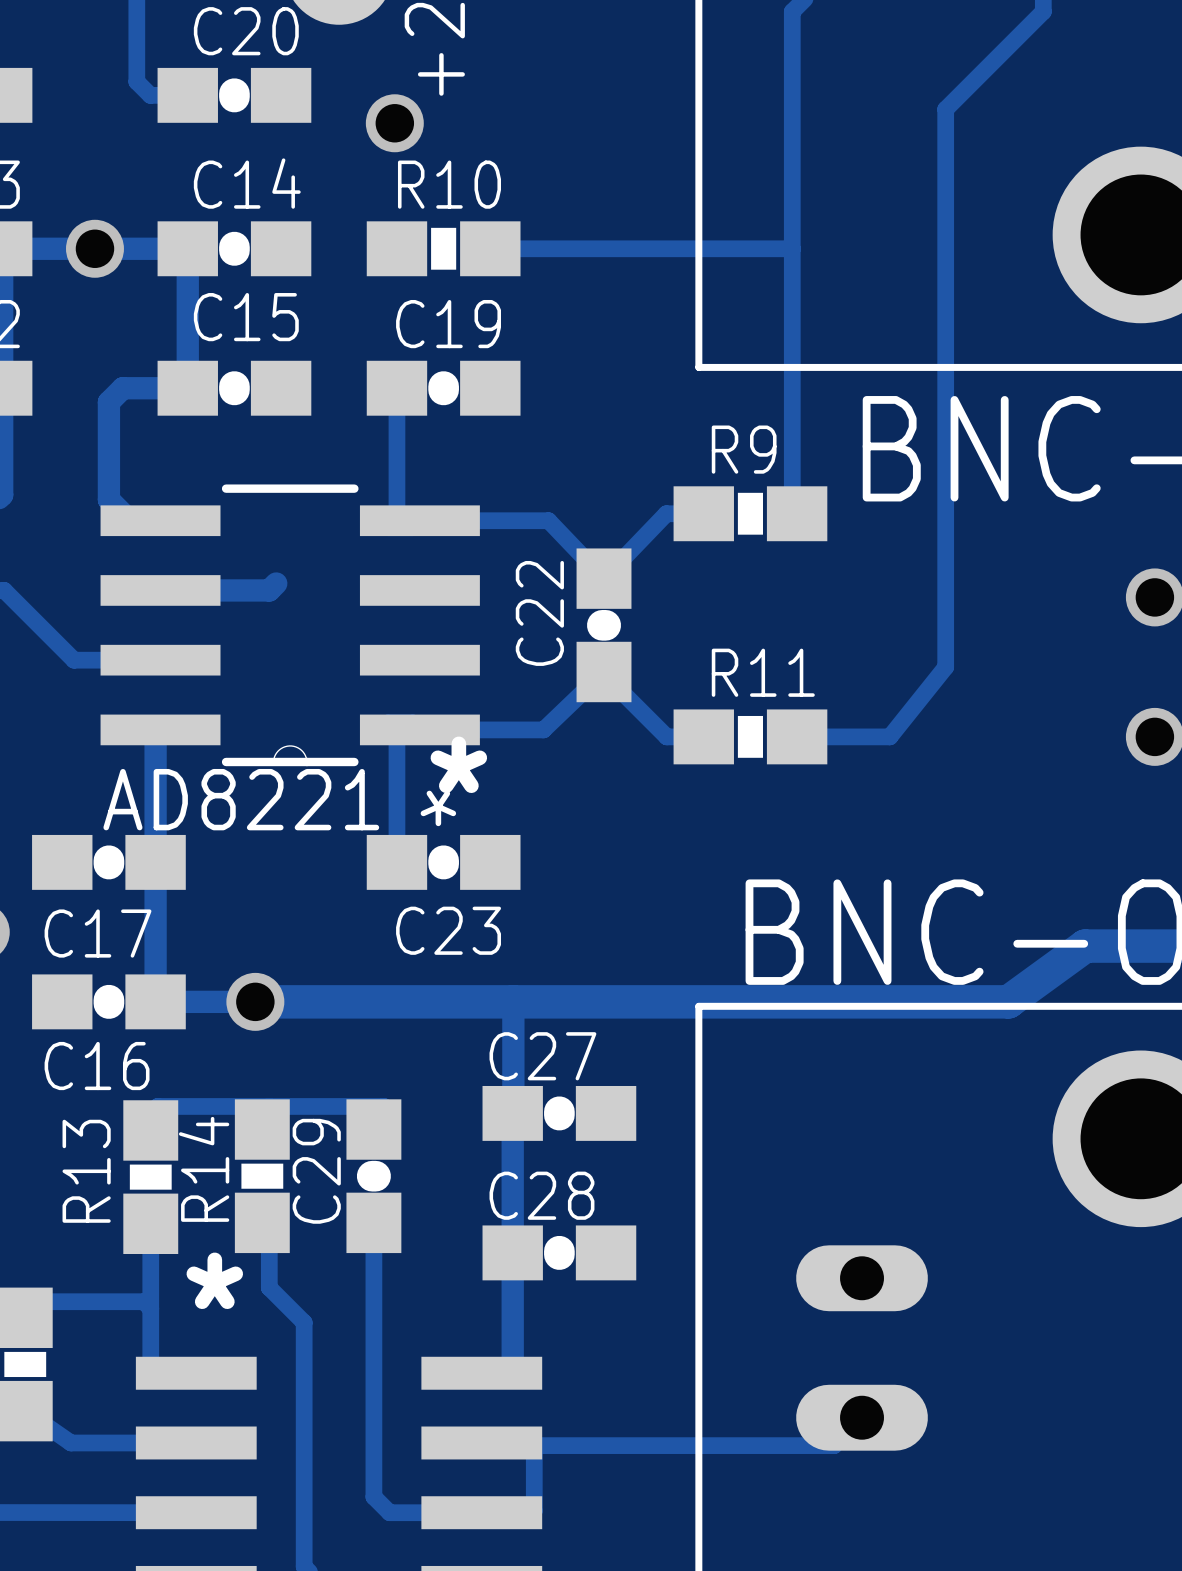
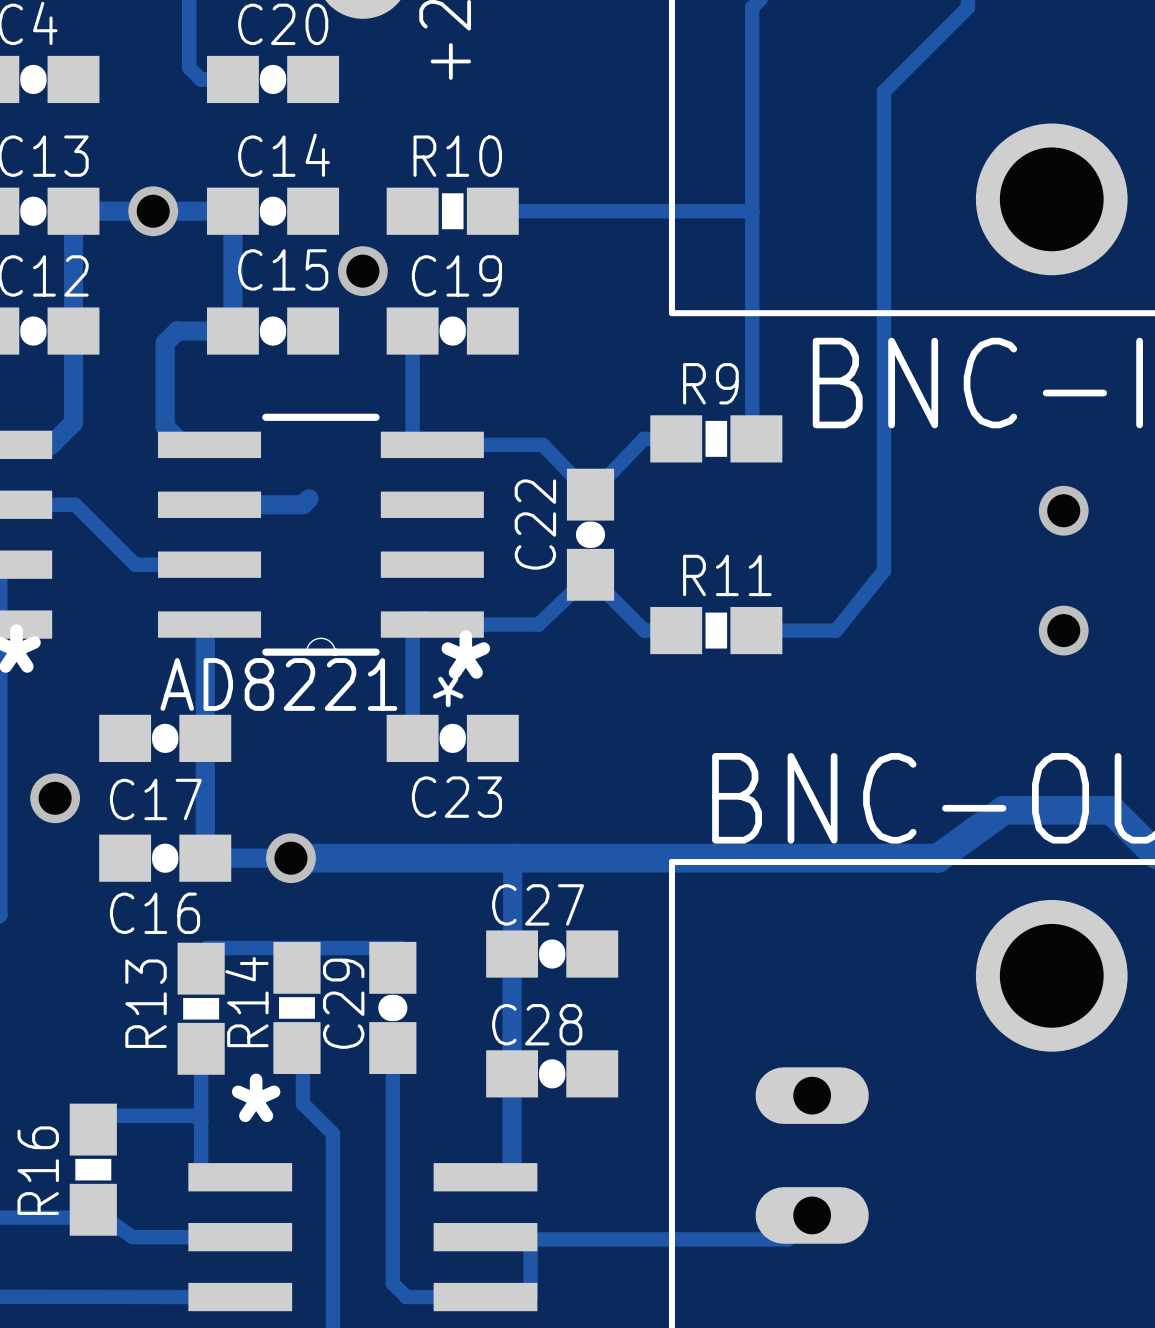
via position: (394, 123) -> (362, 271)

